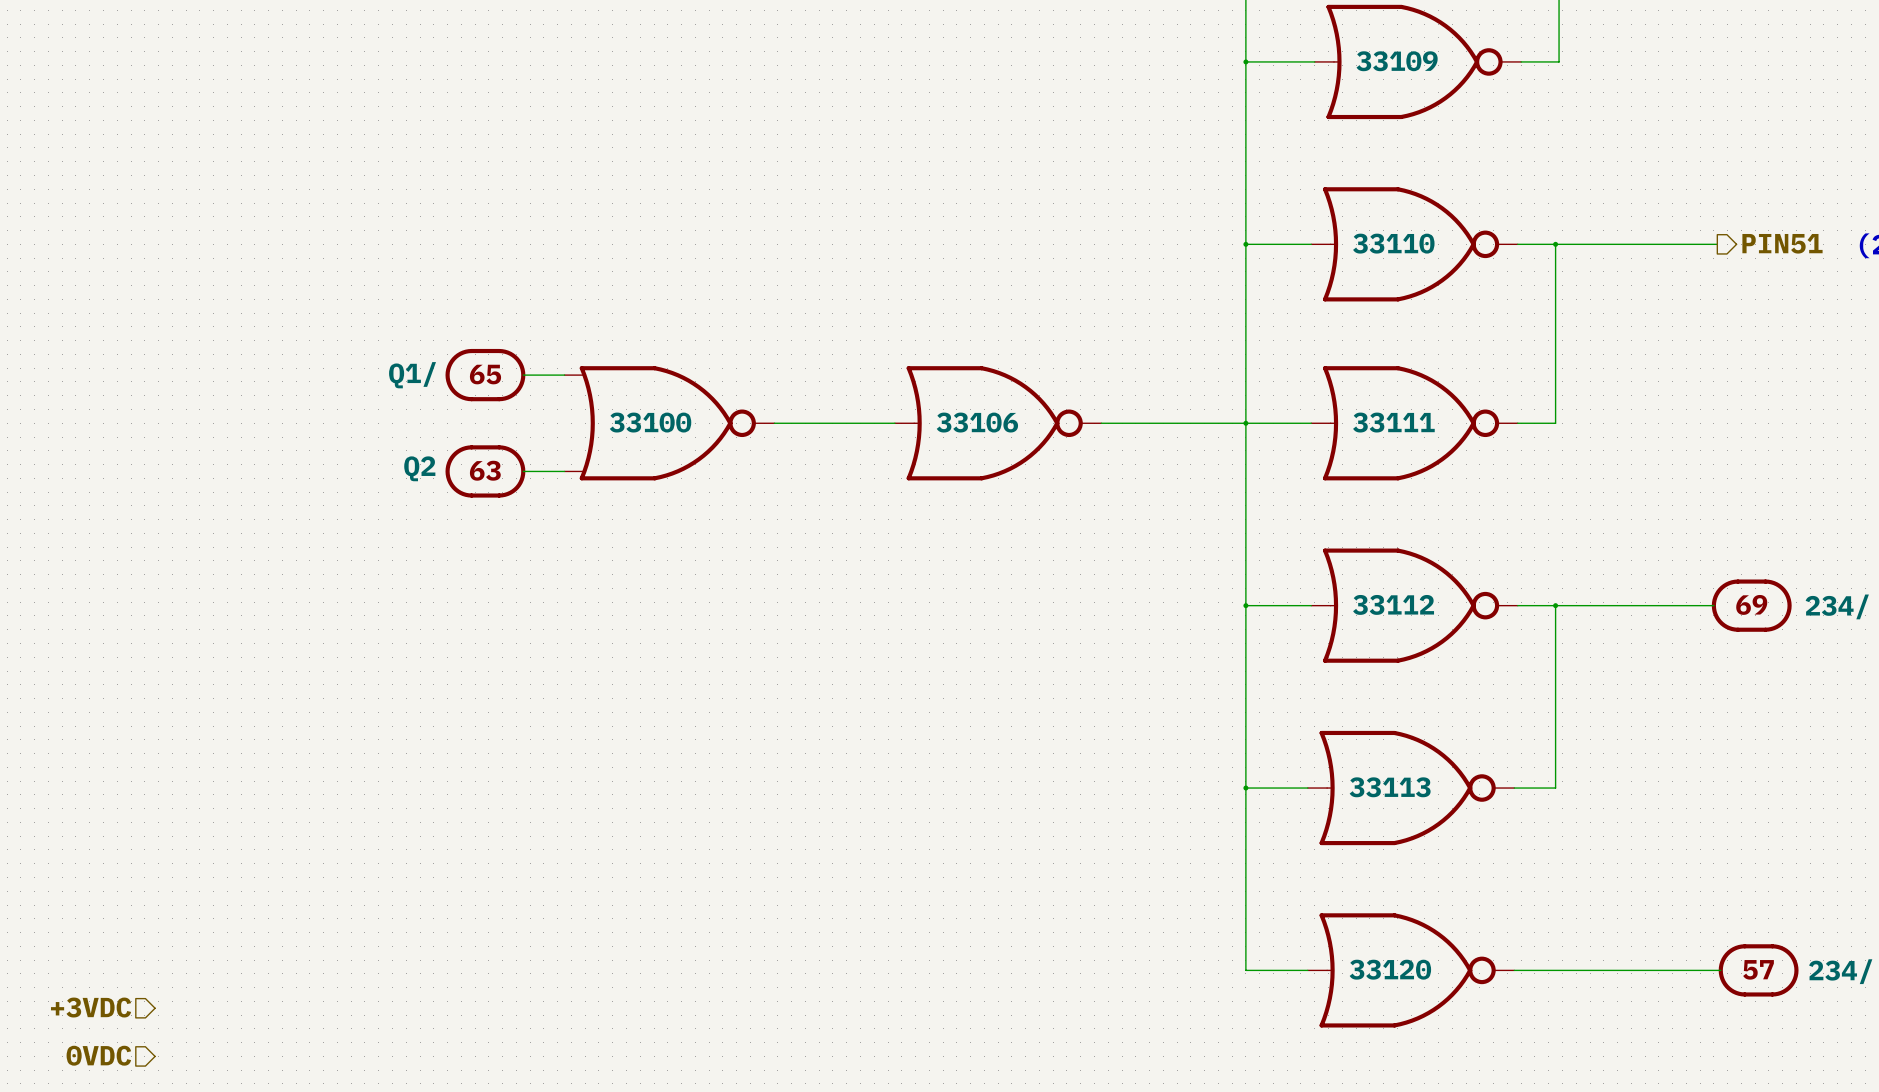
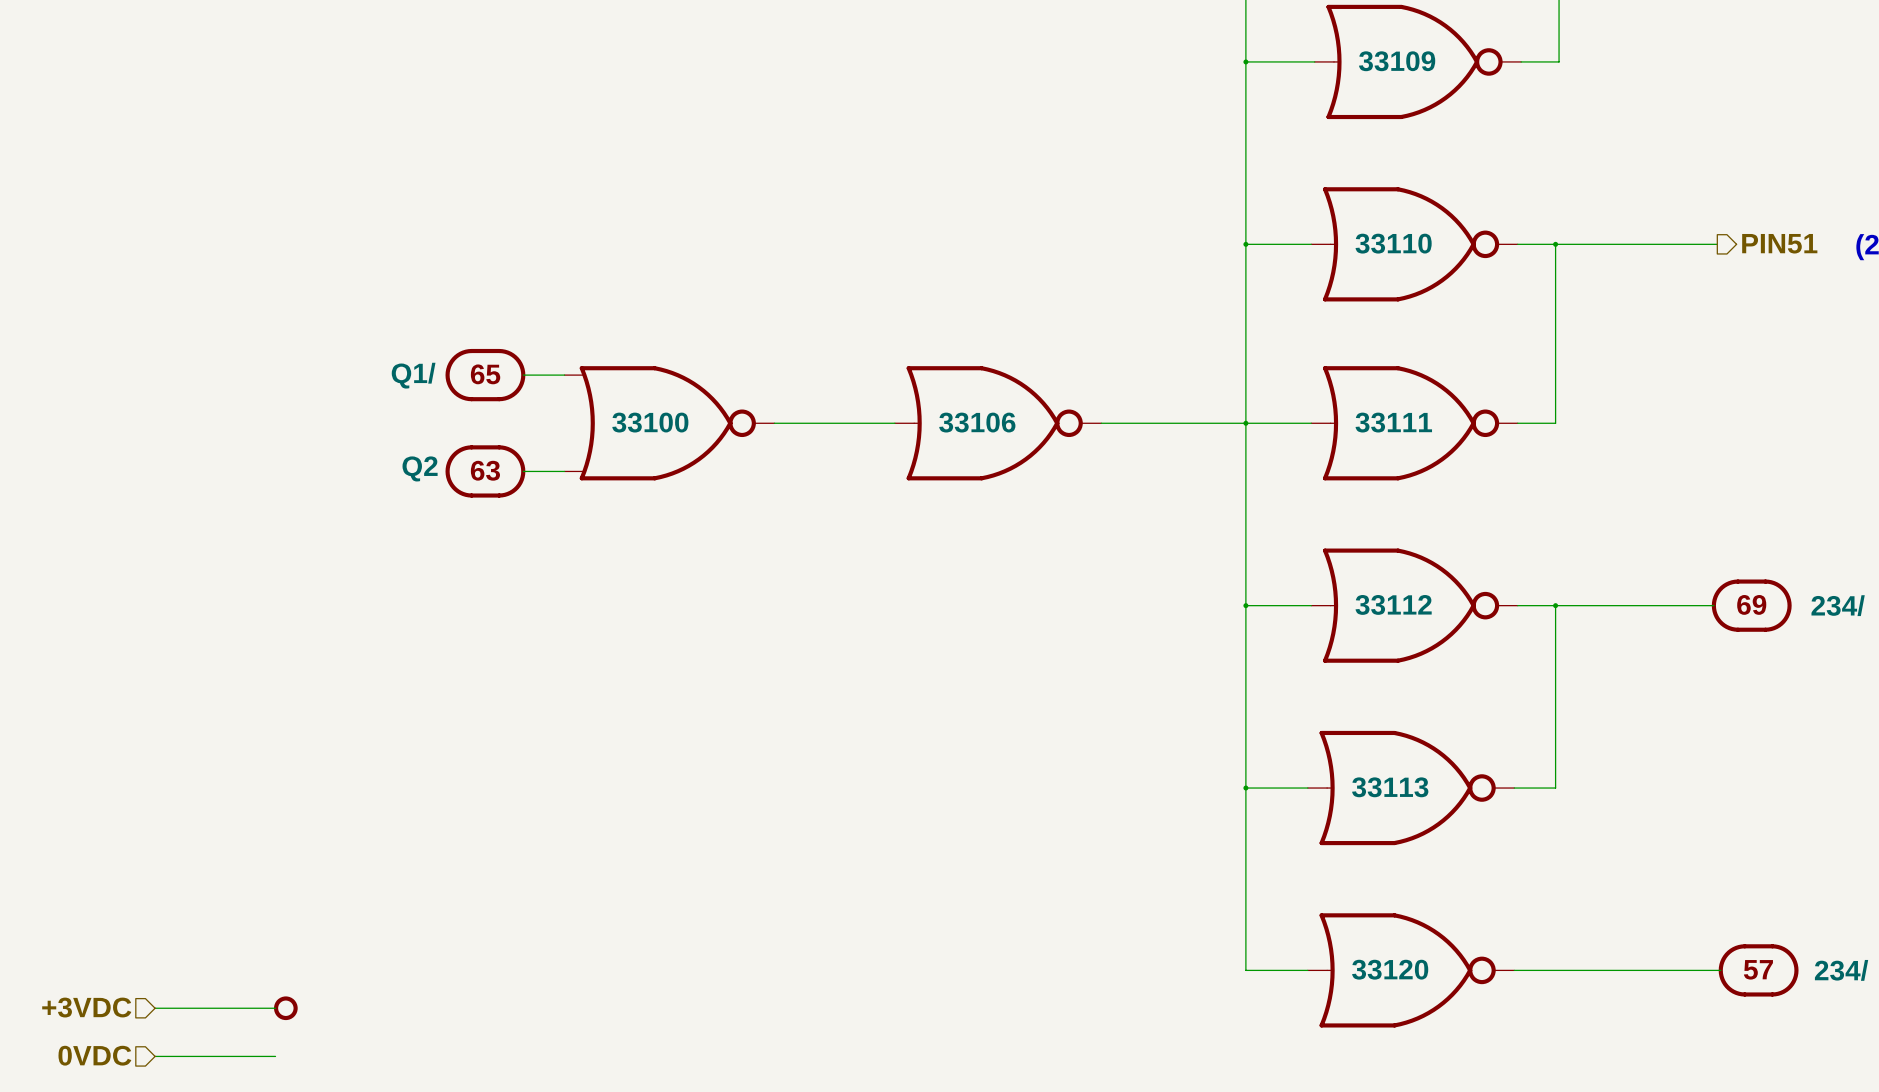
wire: none -> (155, 1008) (275, 1008)
part: none -> (285, 1008)
wire: none -> (155, 1056) (275, 1056)

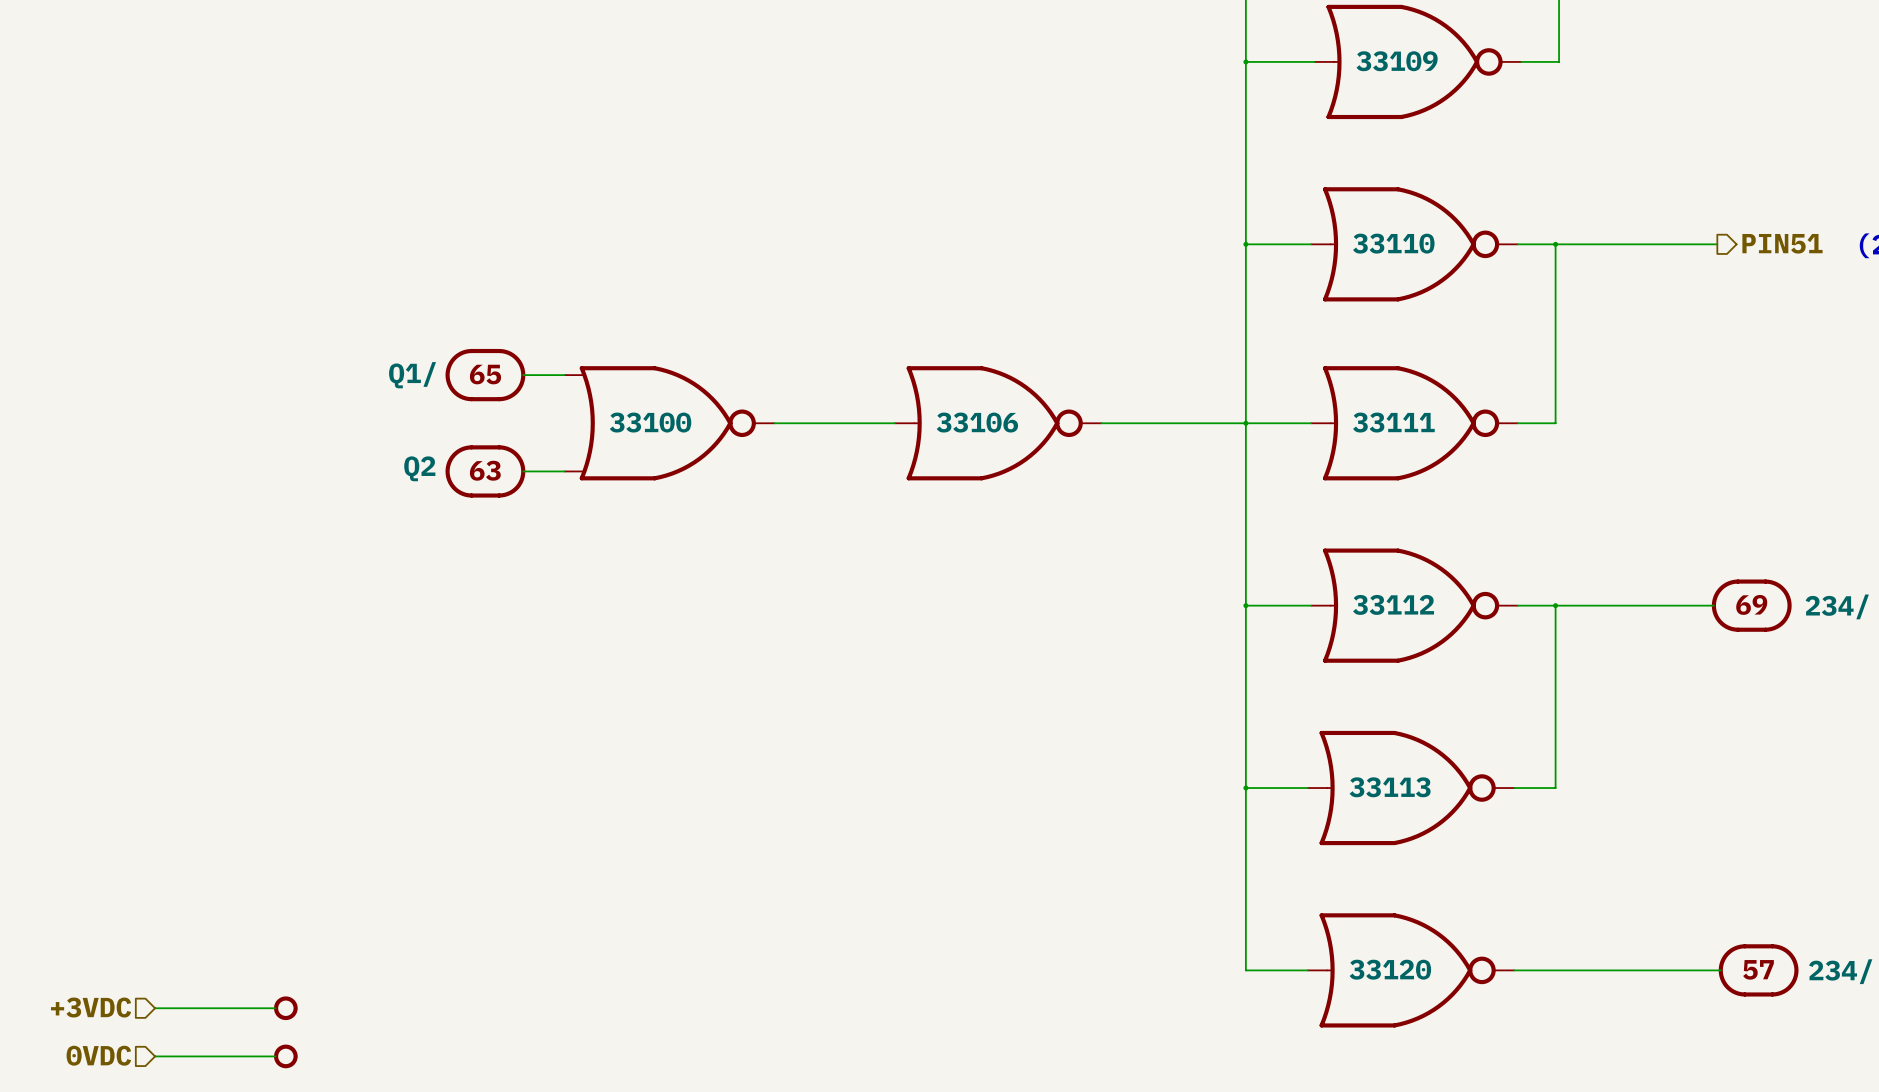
part: none -> (285, 1056)

